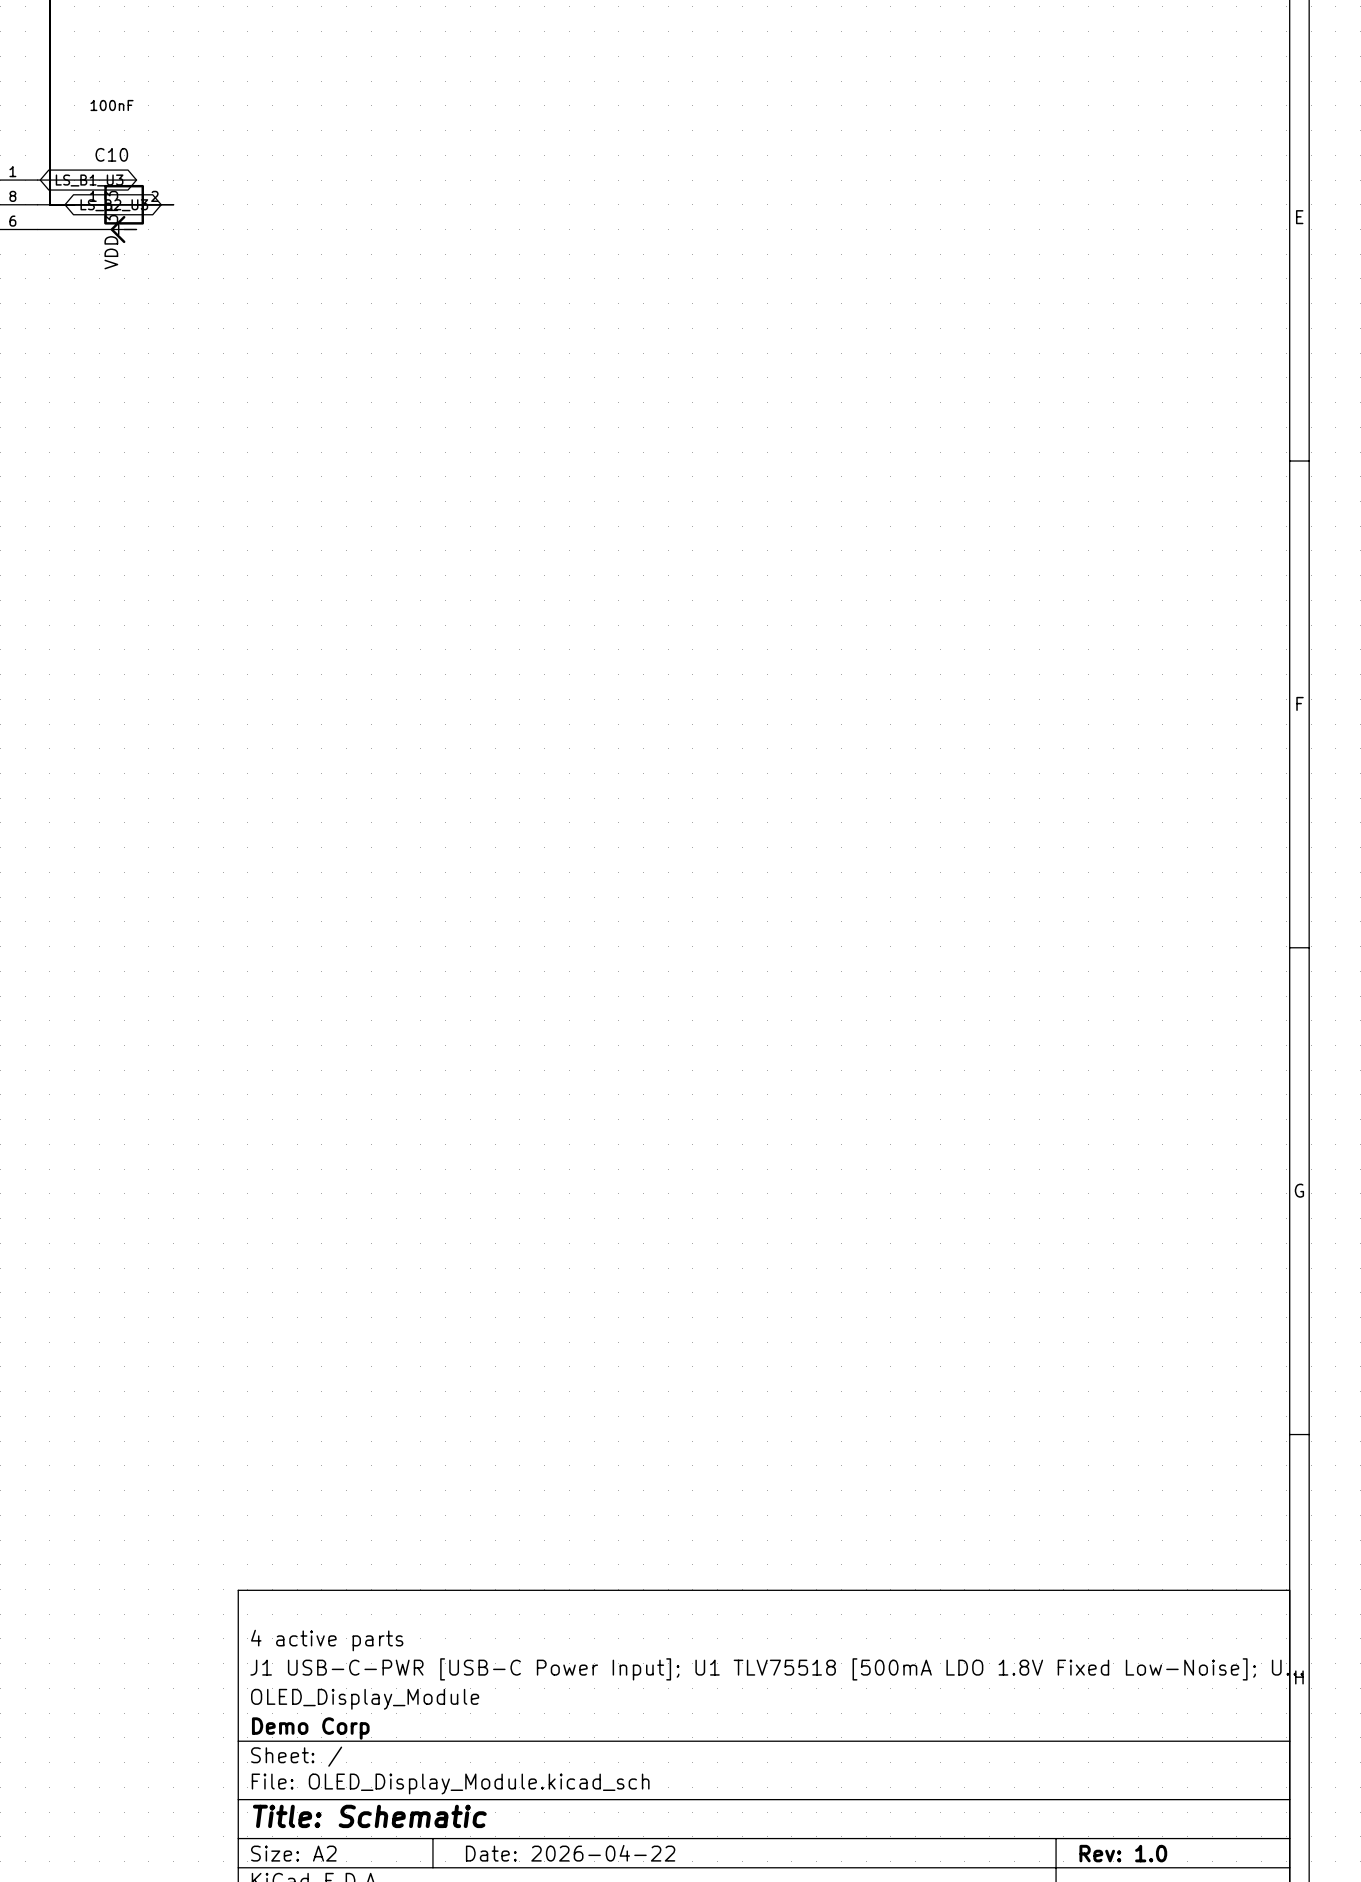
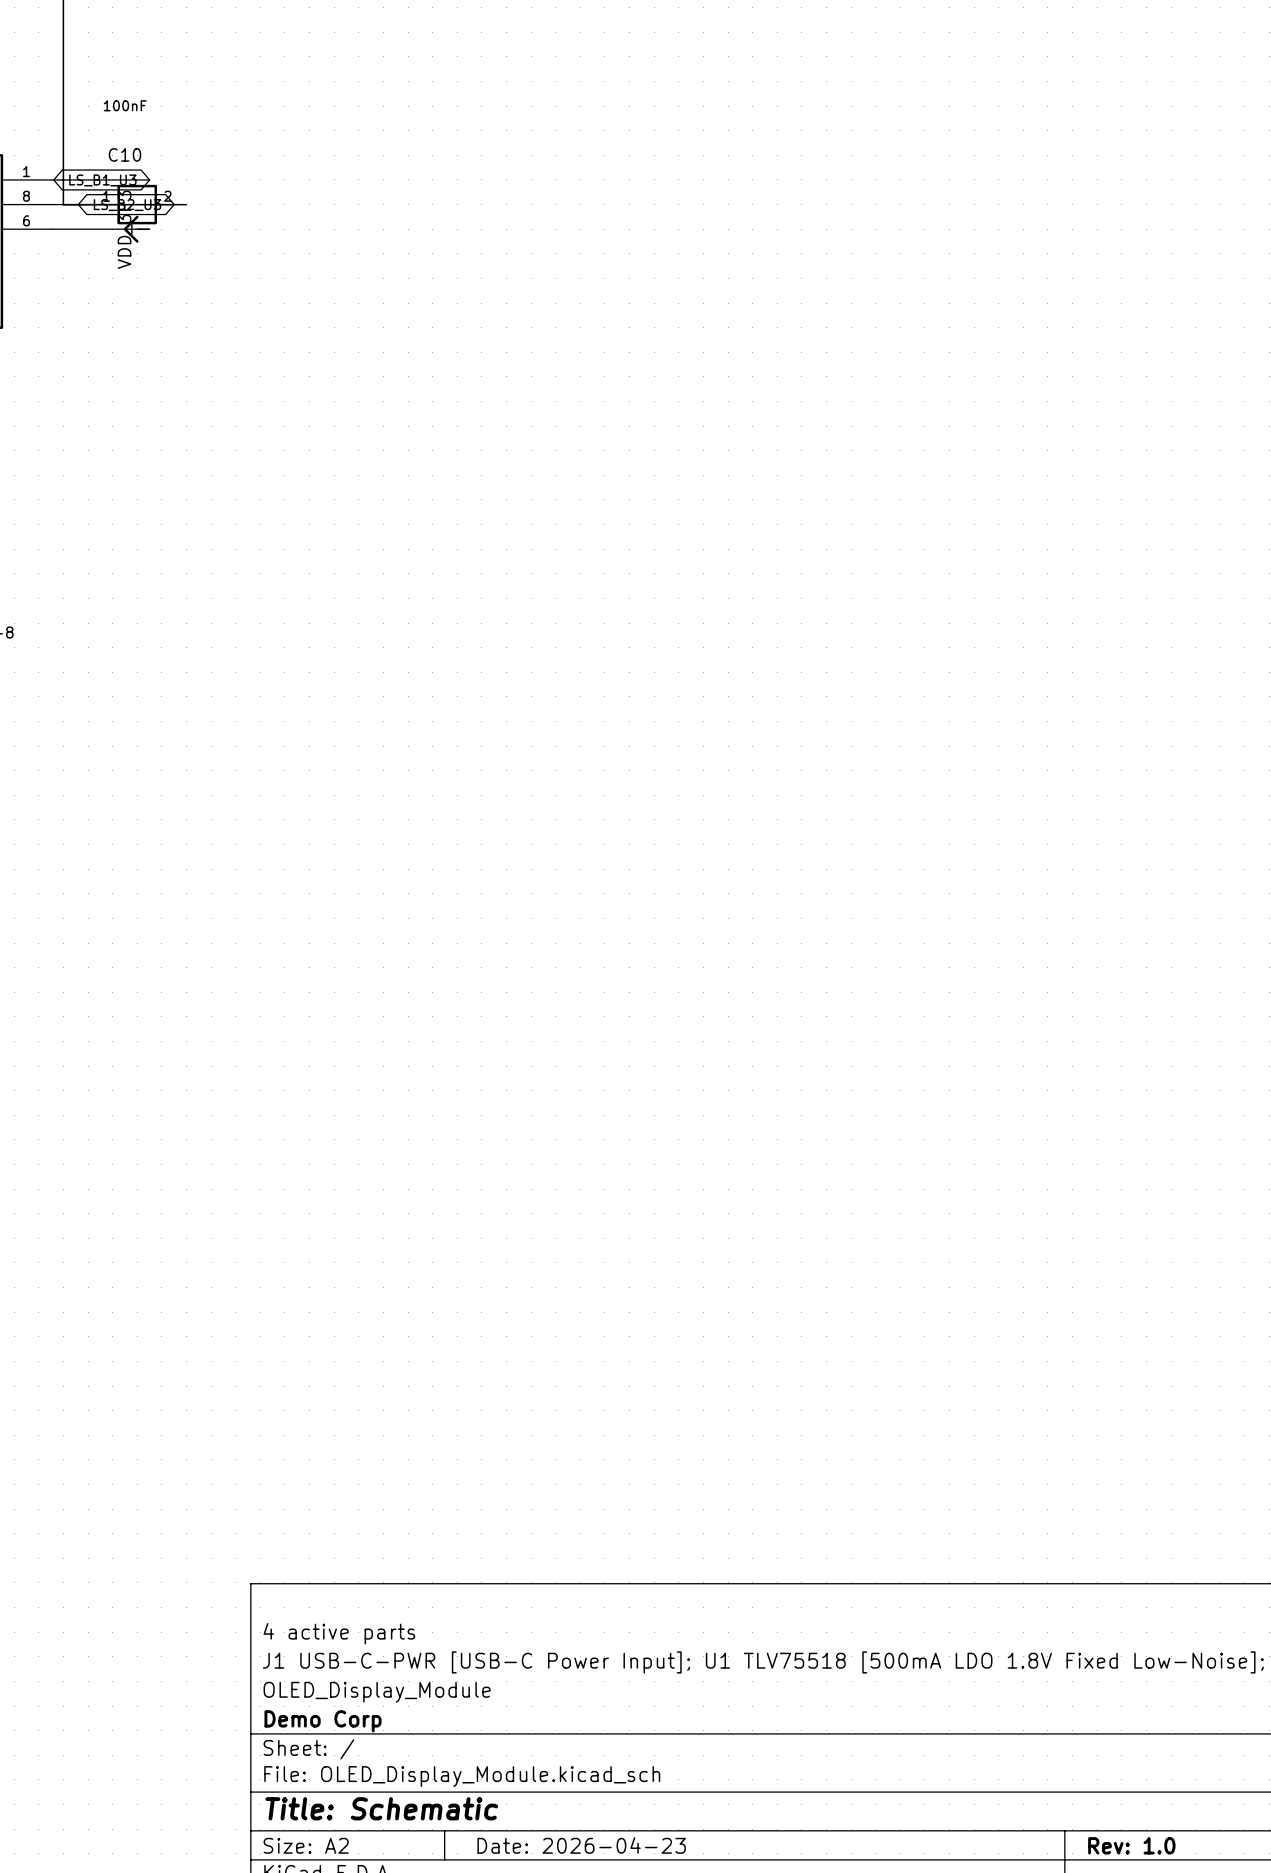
title block: Date: 2026-04-22 (570, 1853) -> Date: 2026-04-23 (581, 1845)

